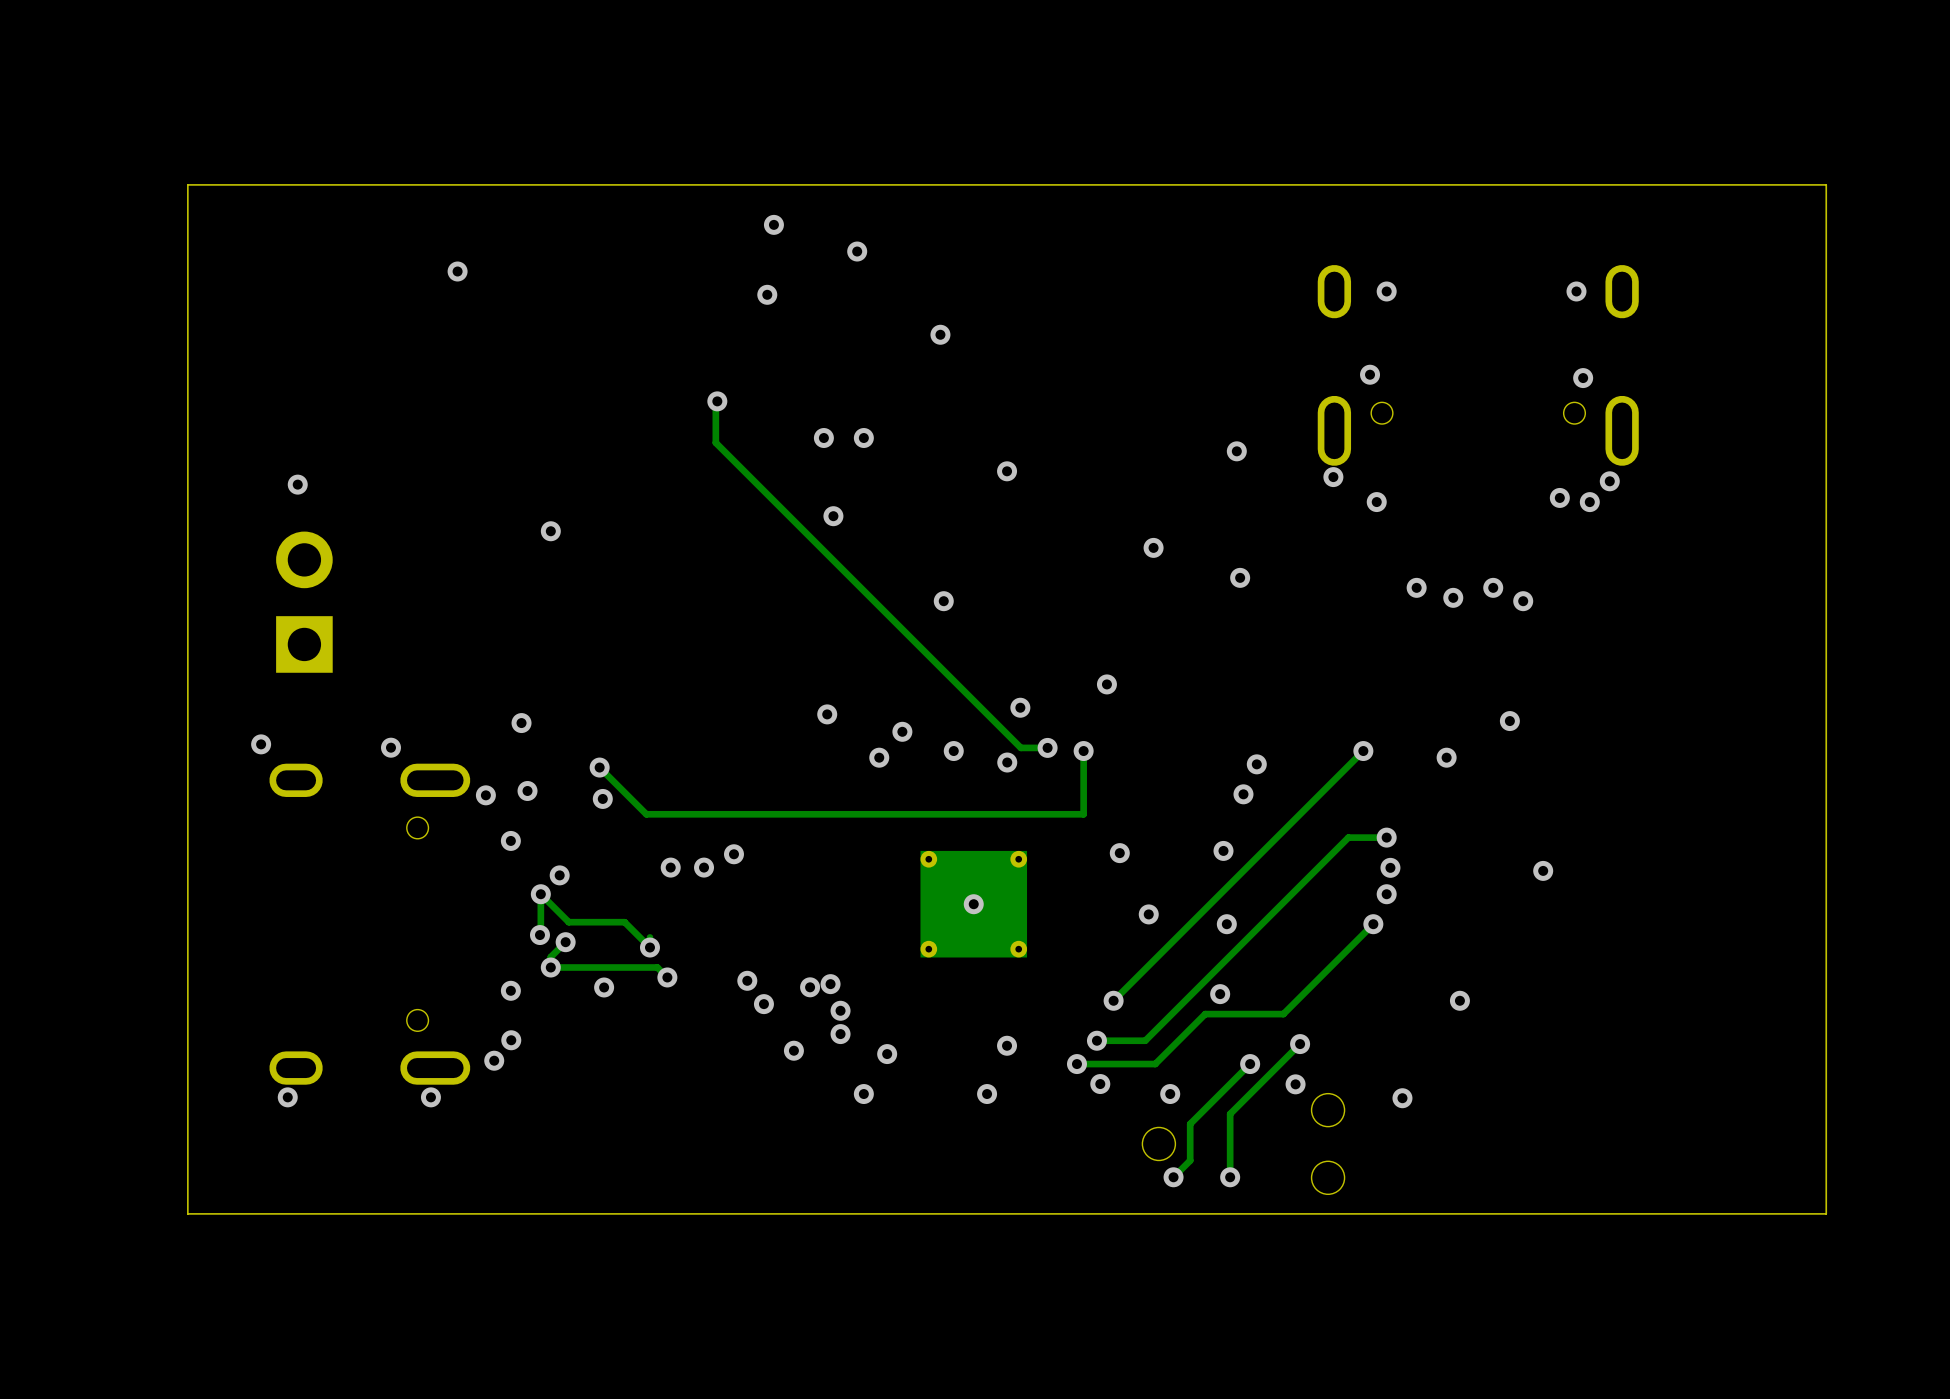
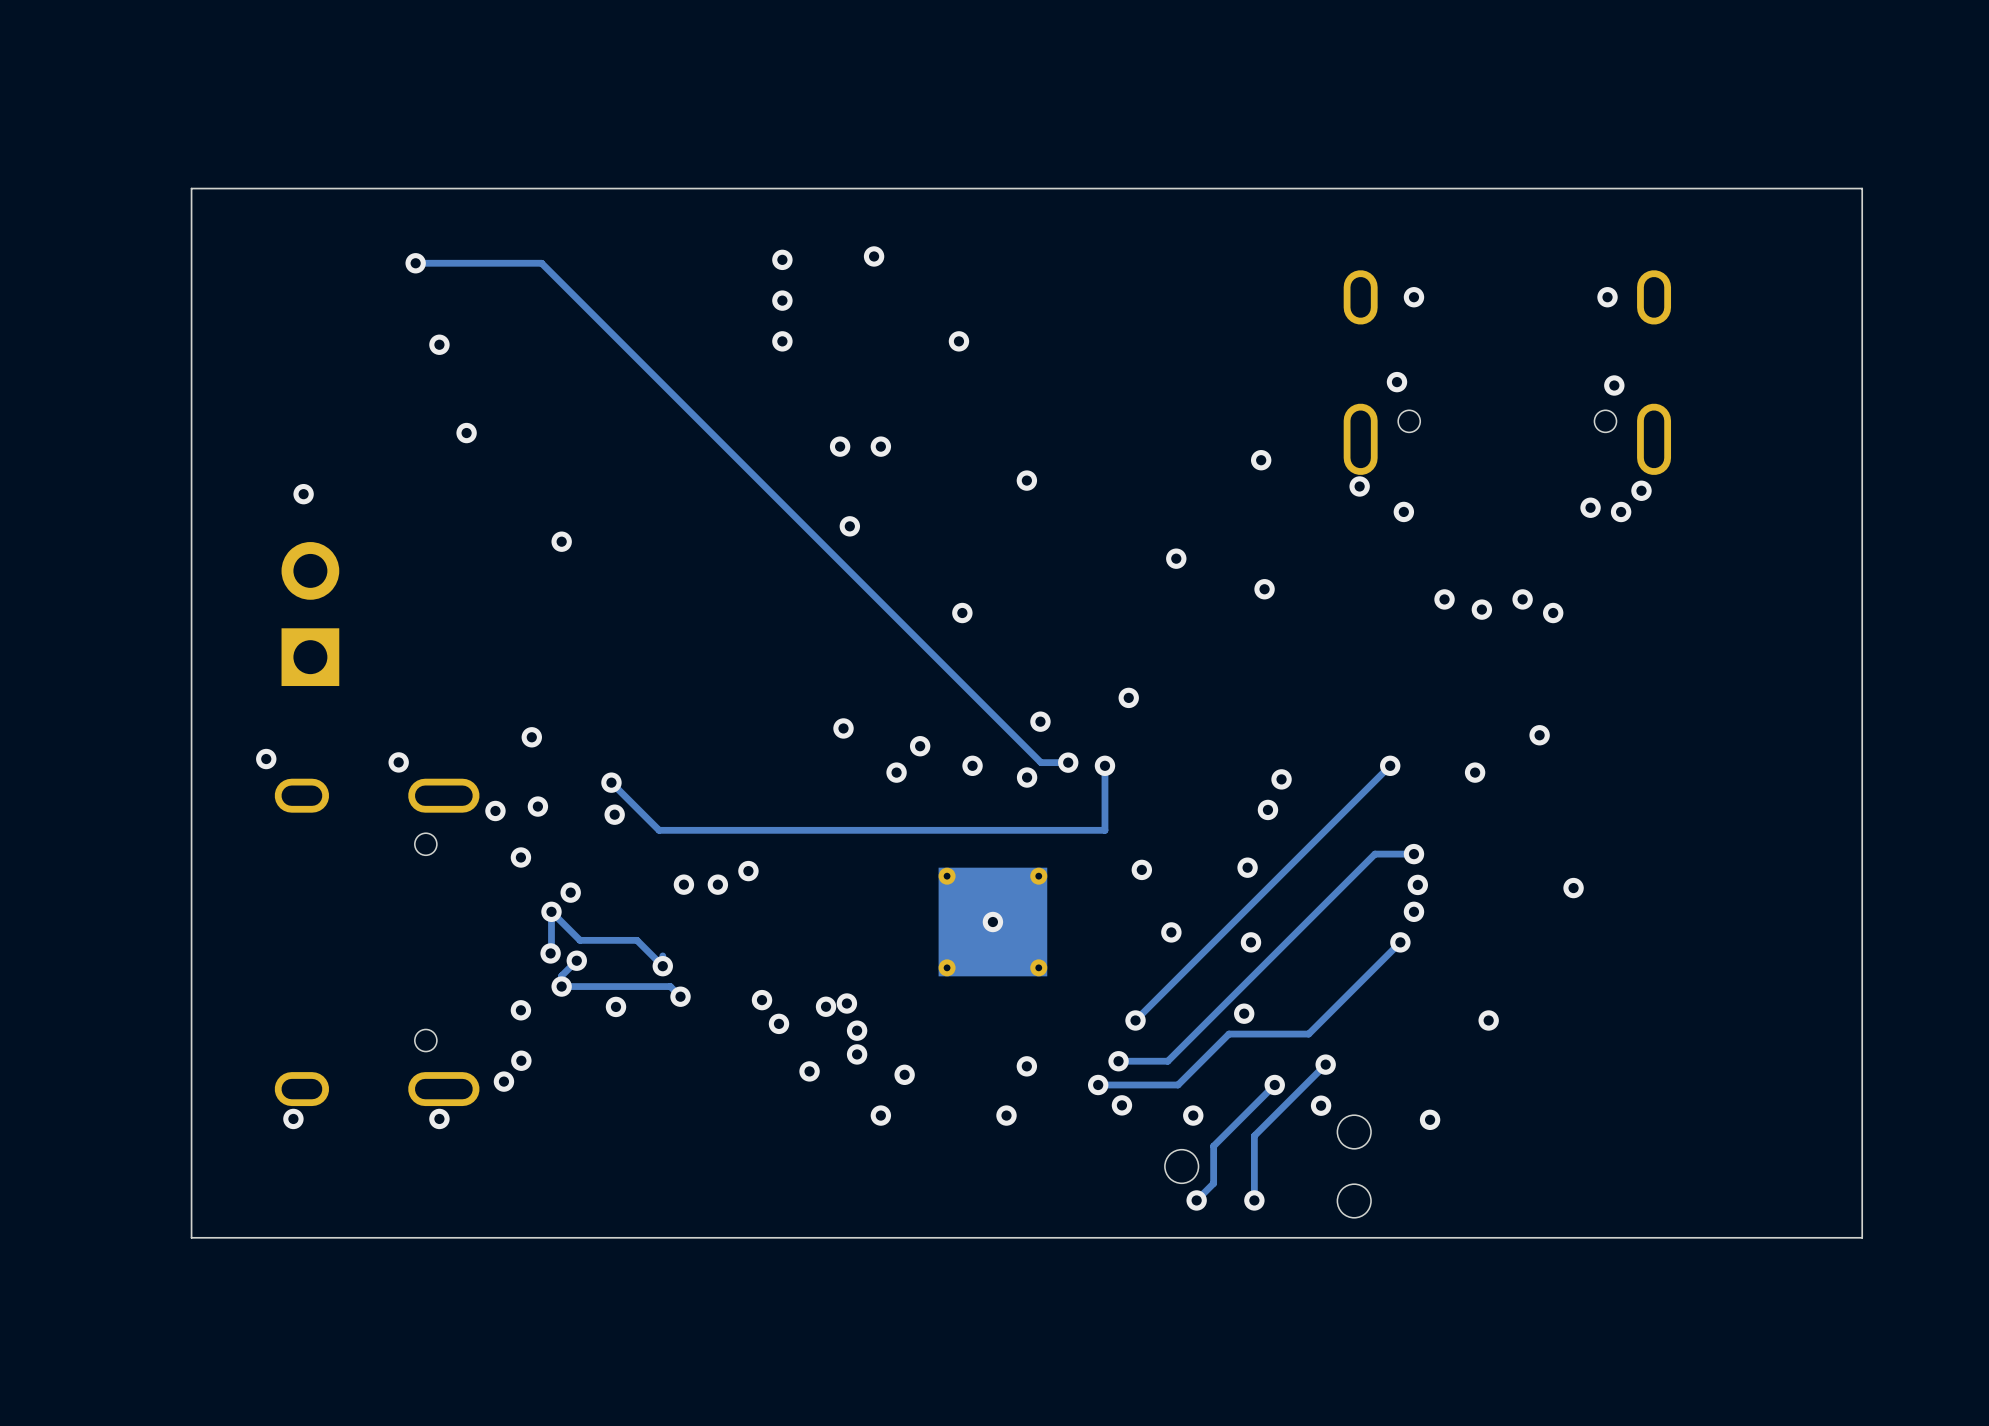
via position: (773, 224) -> (782, 259)
via: none -> (415, 263)
via: (457, 271) -> none
via: none -> (782, 341)
via: none -> (439, 344)
track: (717, 401) (715, 442) -> (415, 263) (541, 263) (729, 451)
via: (717, 401) -> none
via: none -> (466, 433)

